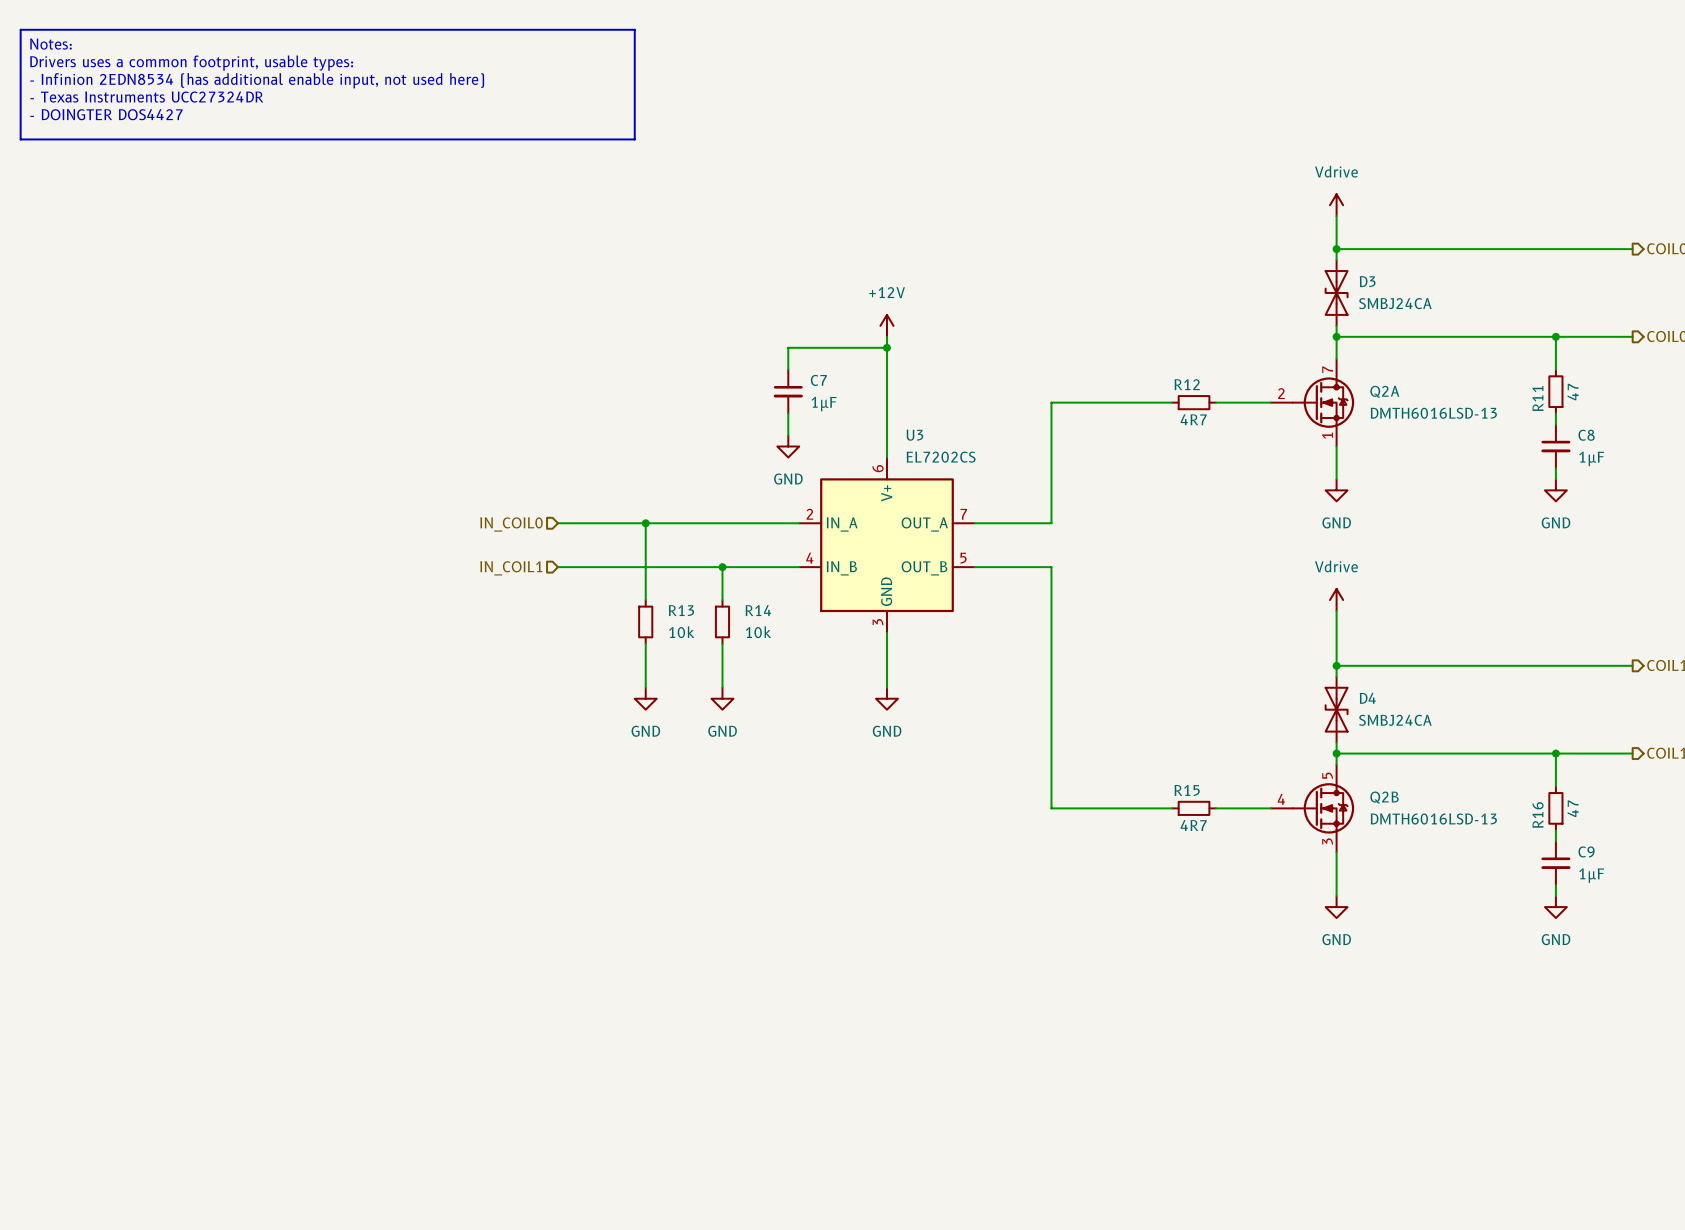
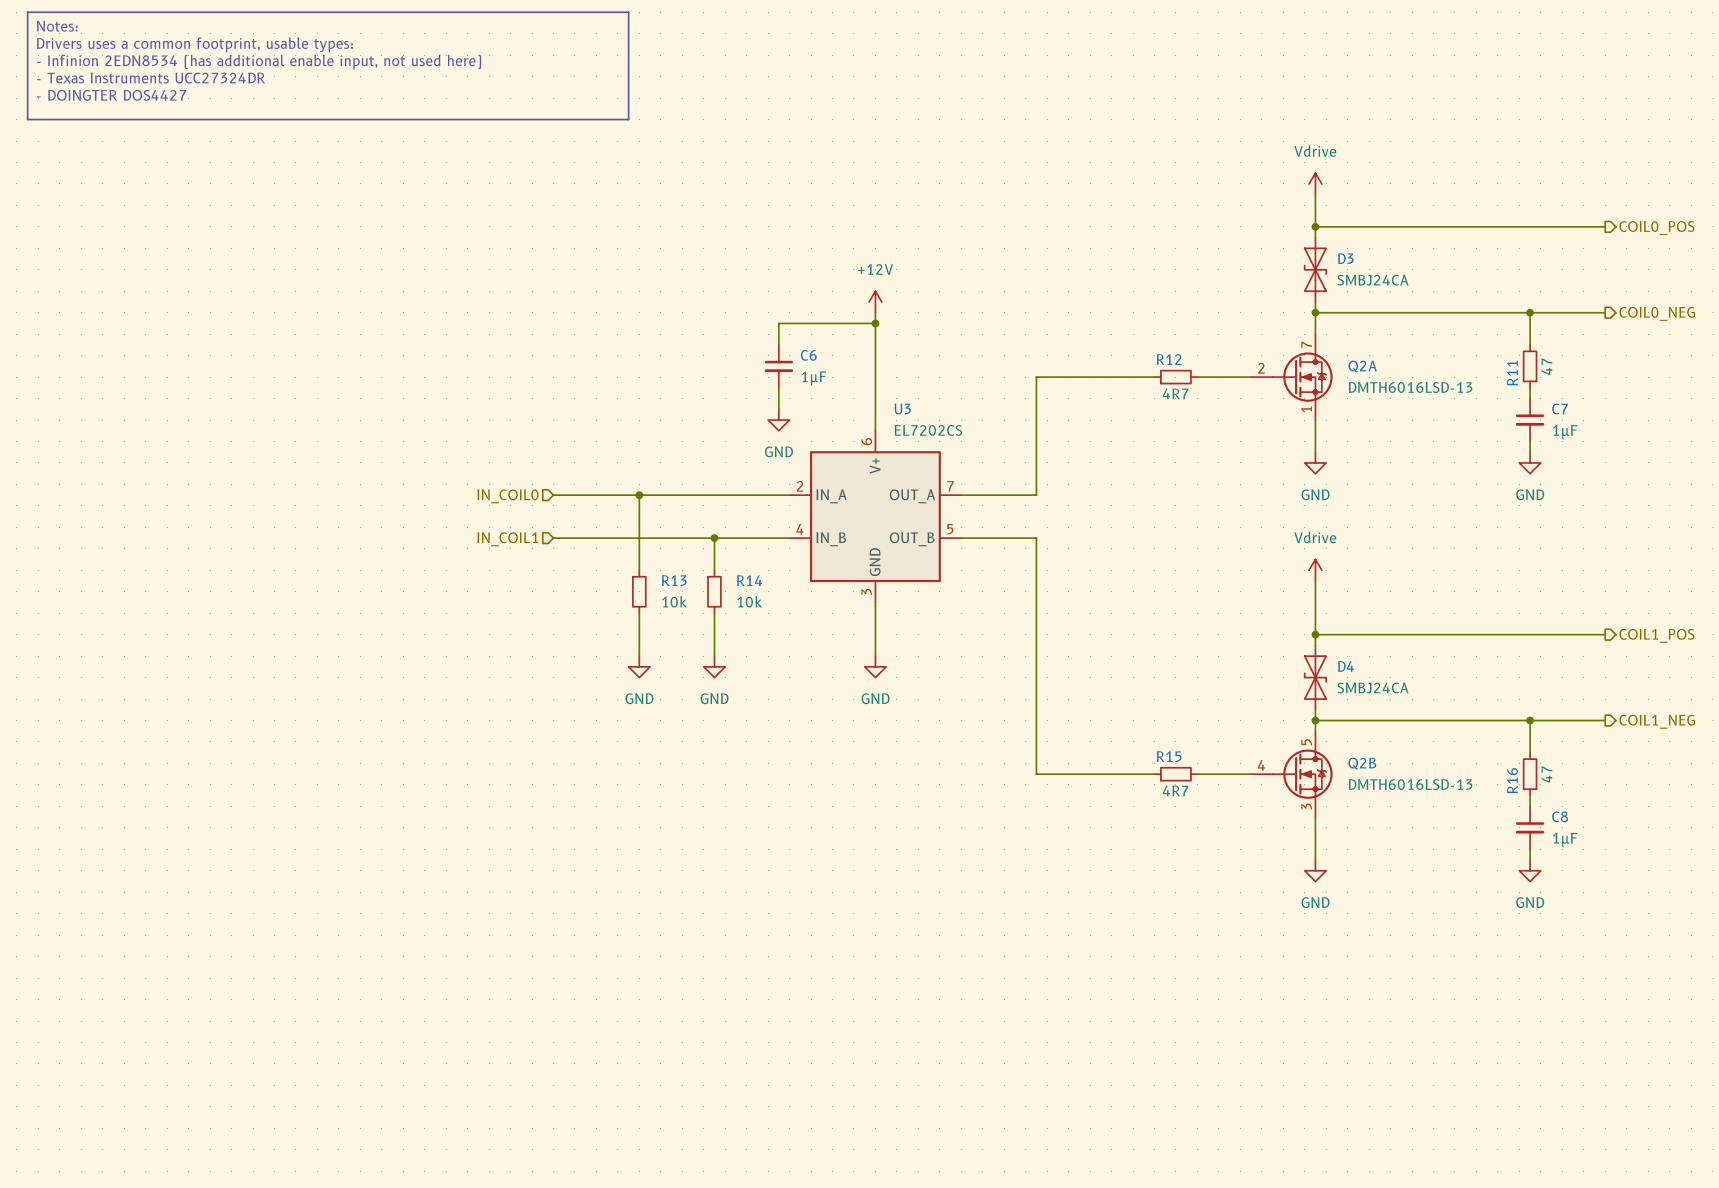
C7 name: C7 (818, 380) -> C6 (808, 355)
C8 name: C8 (1586, 435) -> C7 (1559, 409)
C9 name: C9 (1586, 851) -> C8 (1560, 816)

